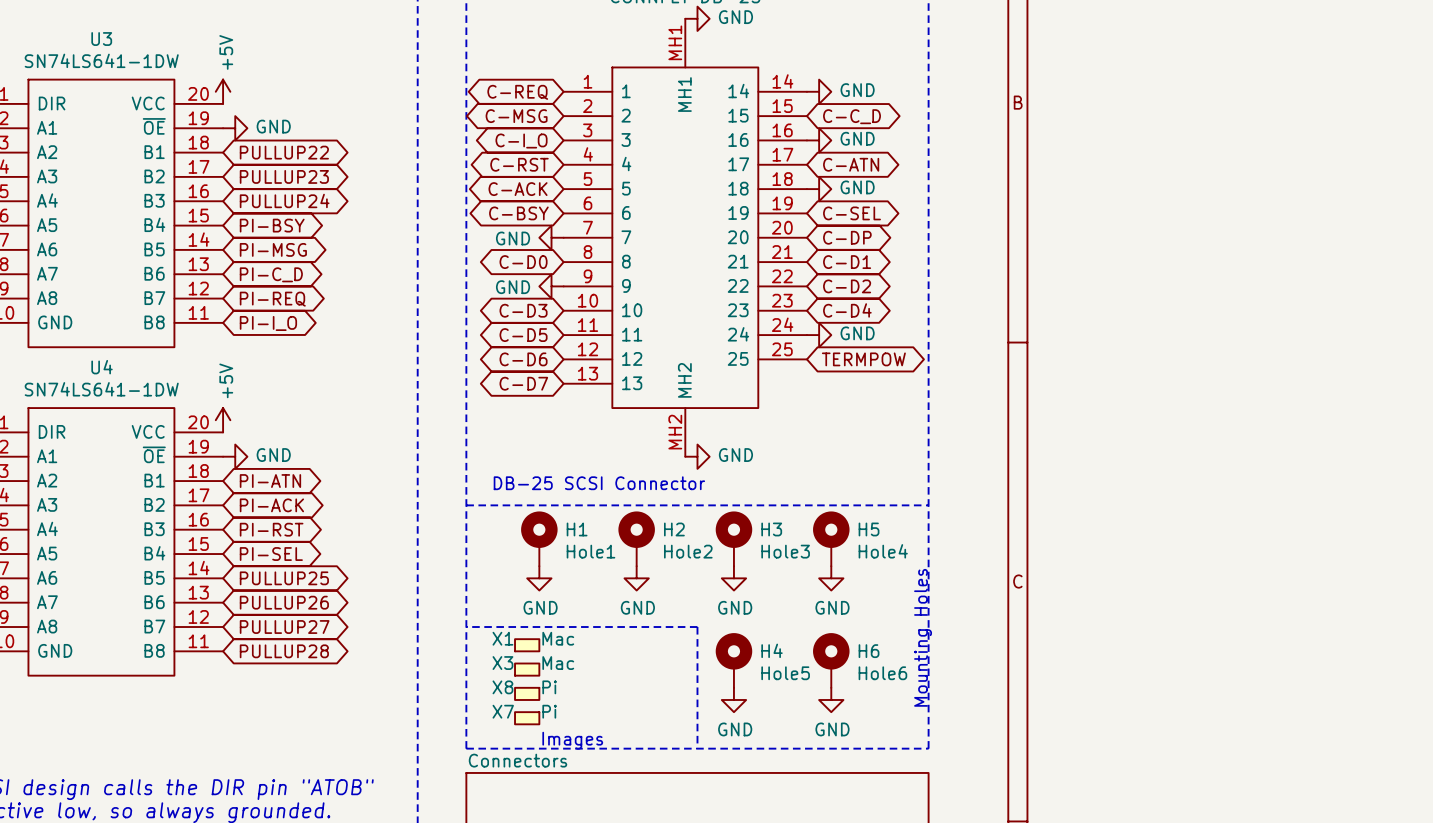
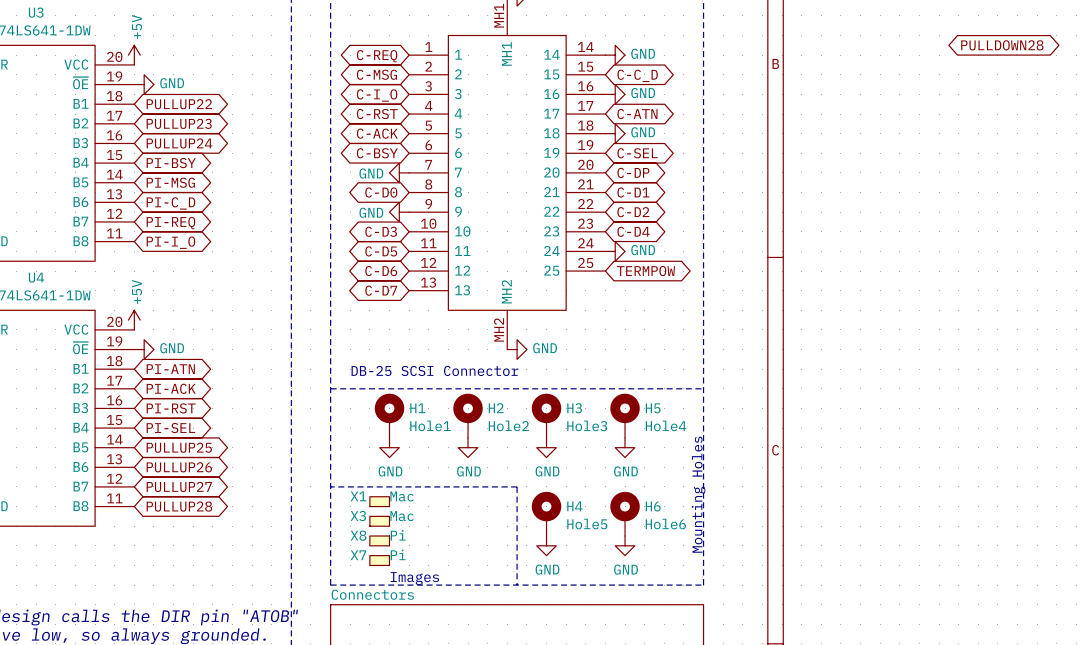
global label: none -> PULLDOWN28 (1002, 45)

